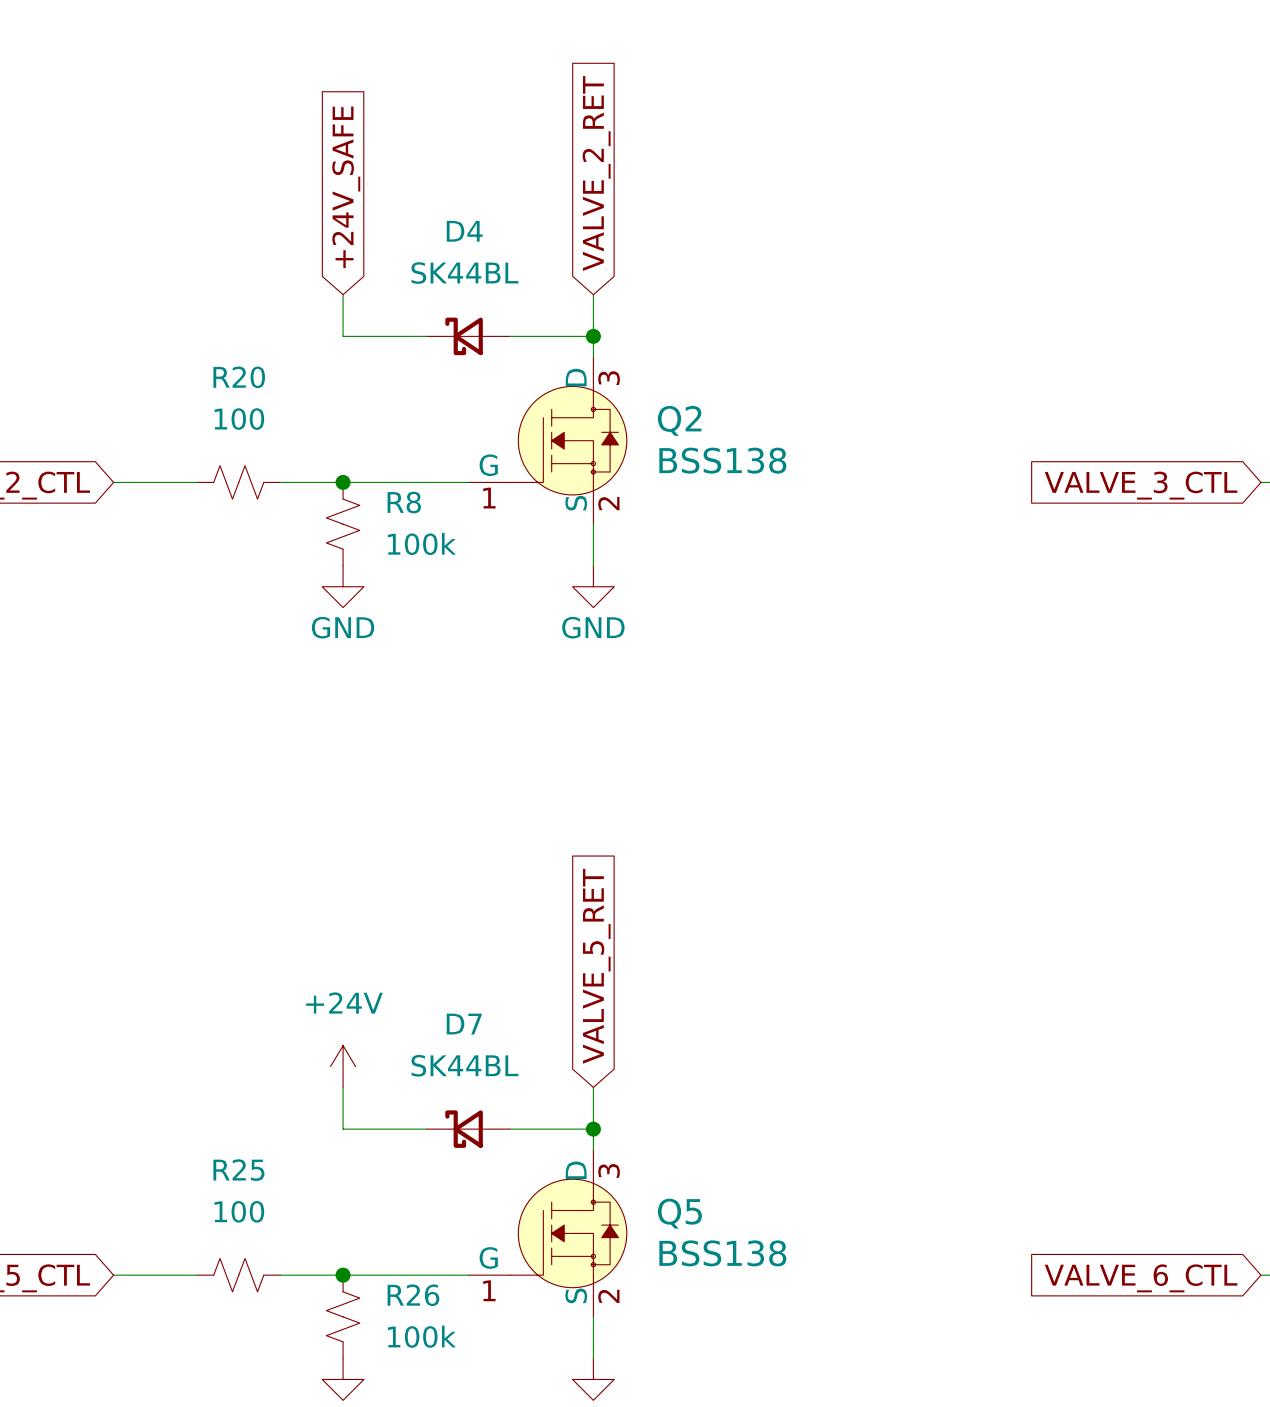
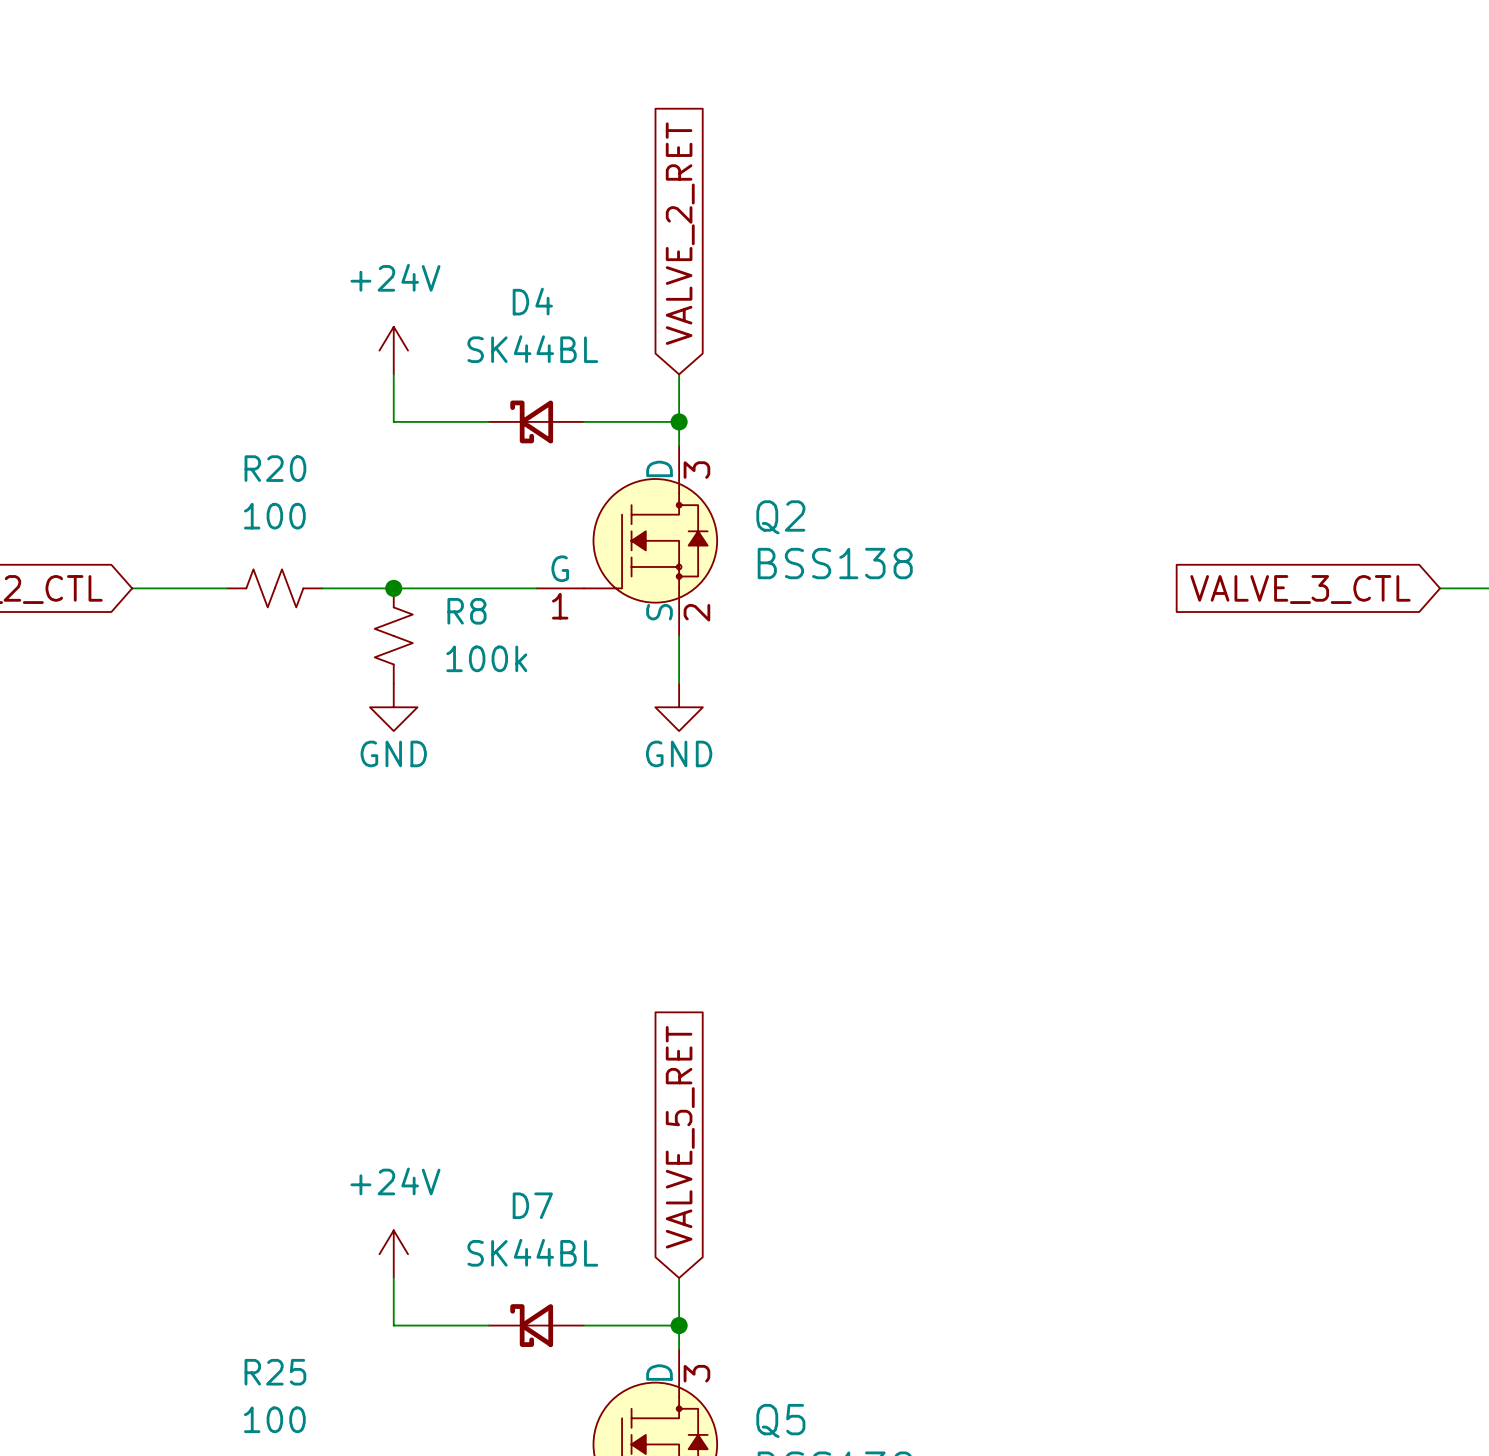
global label: +24V_SAFE (346, 187) -> none
power symbol: none -> +24V (393, 350)

